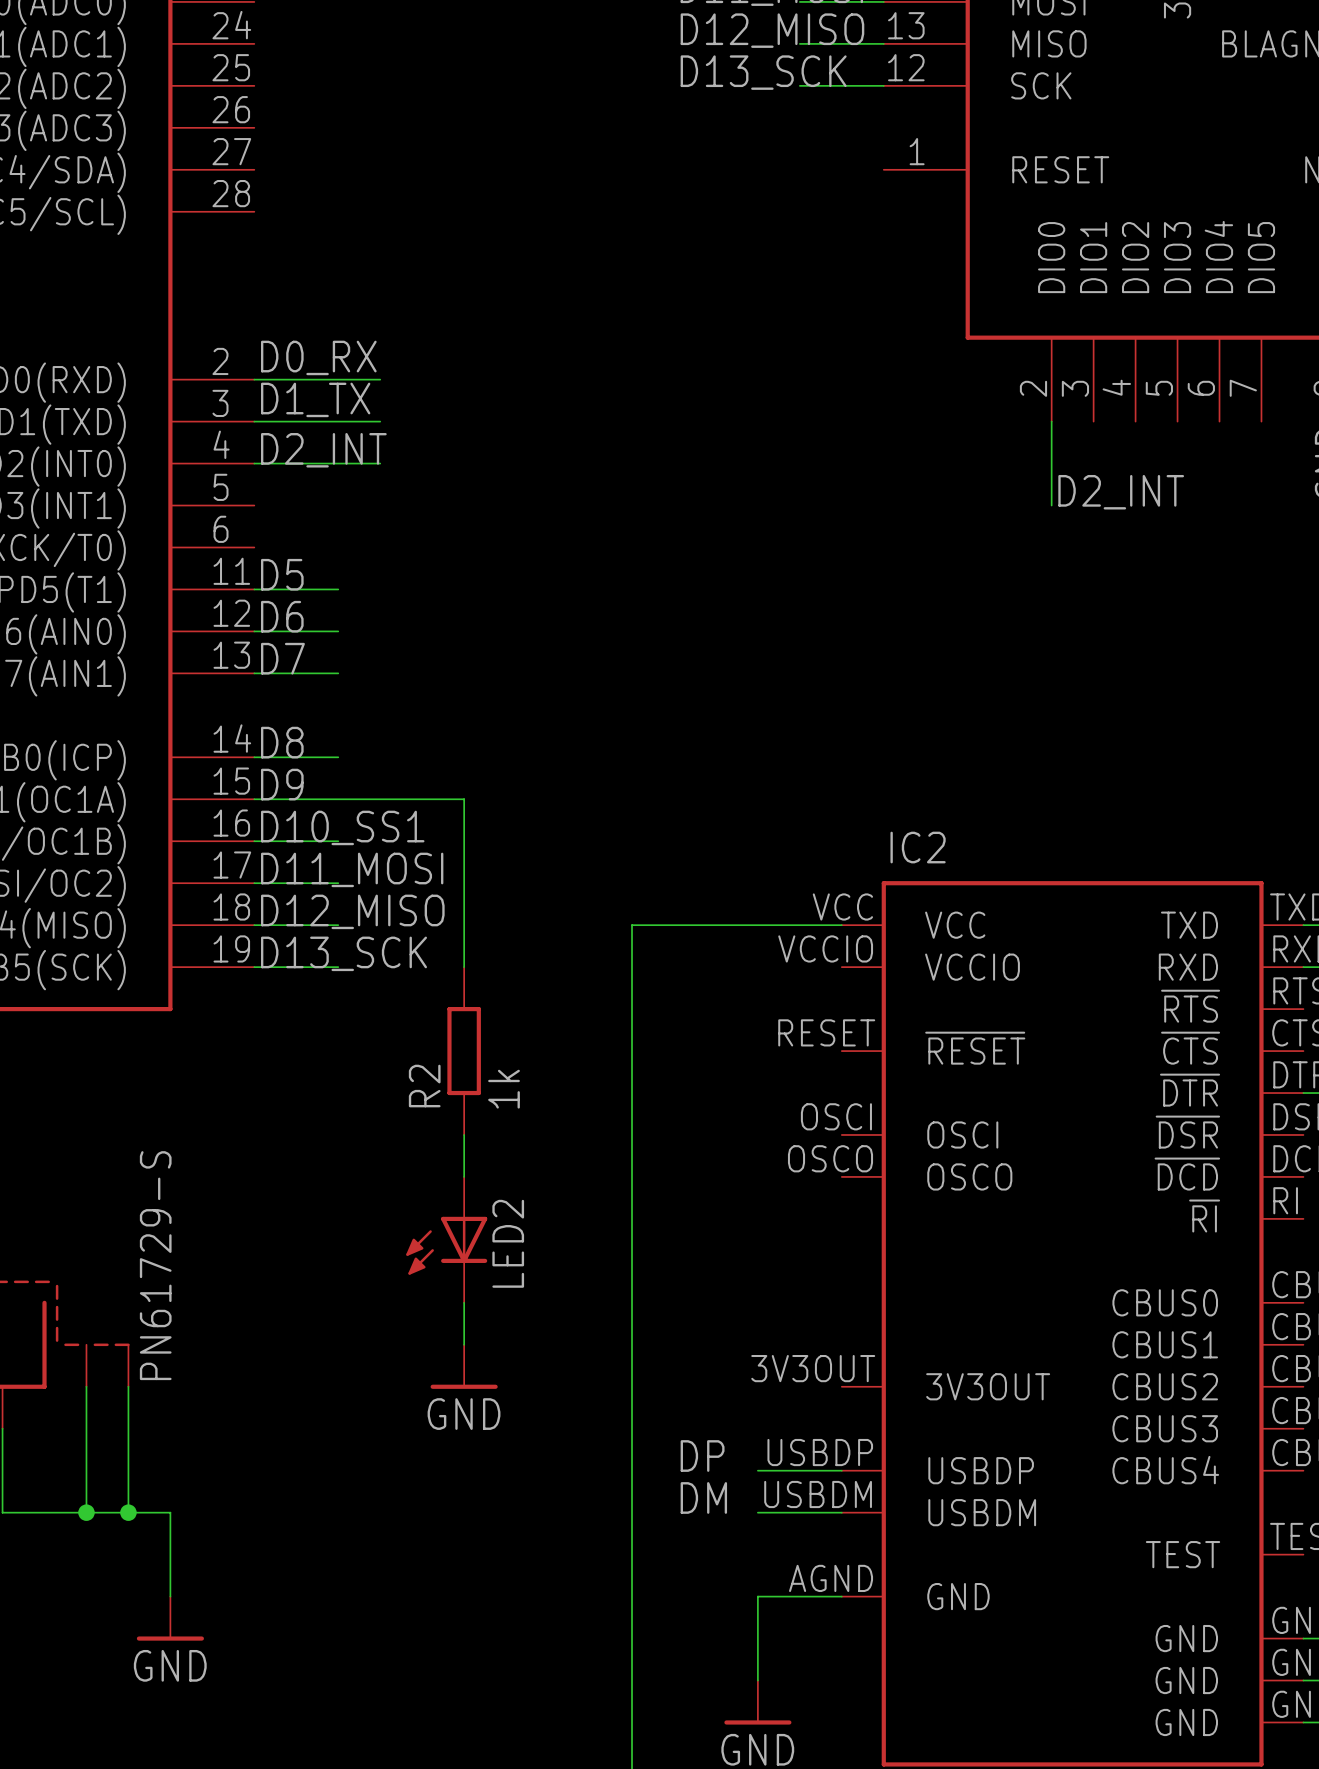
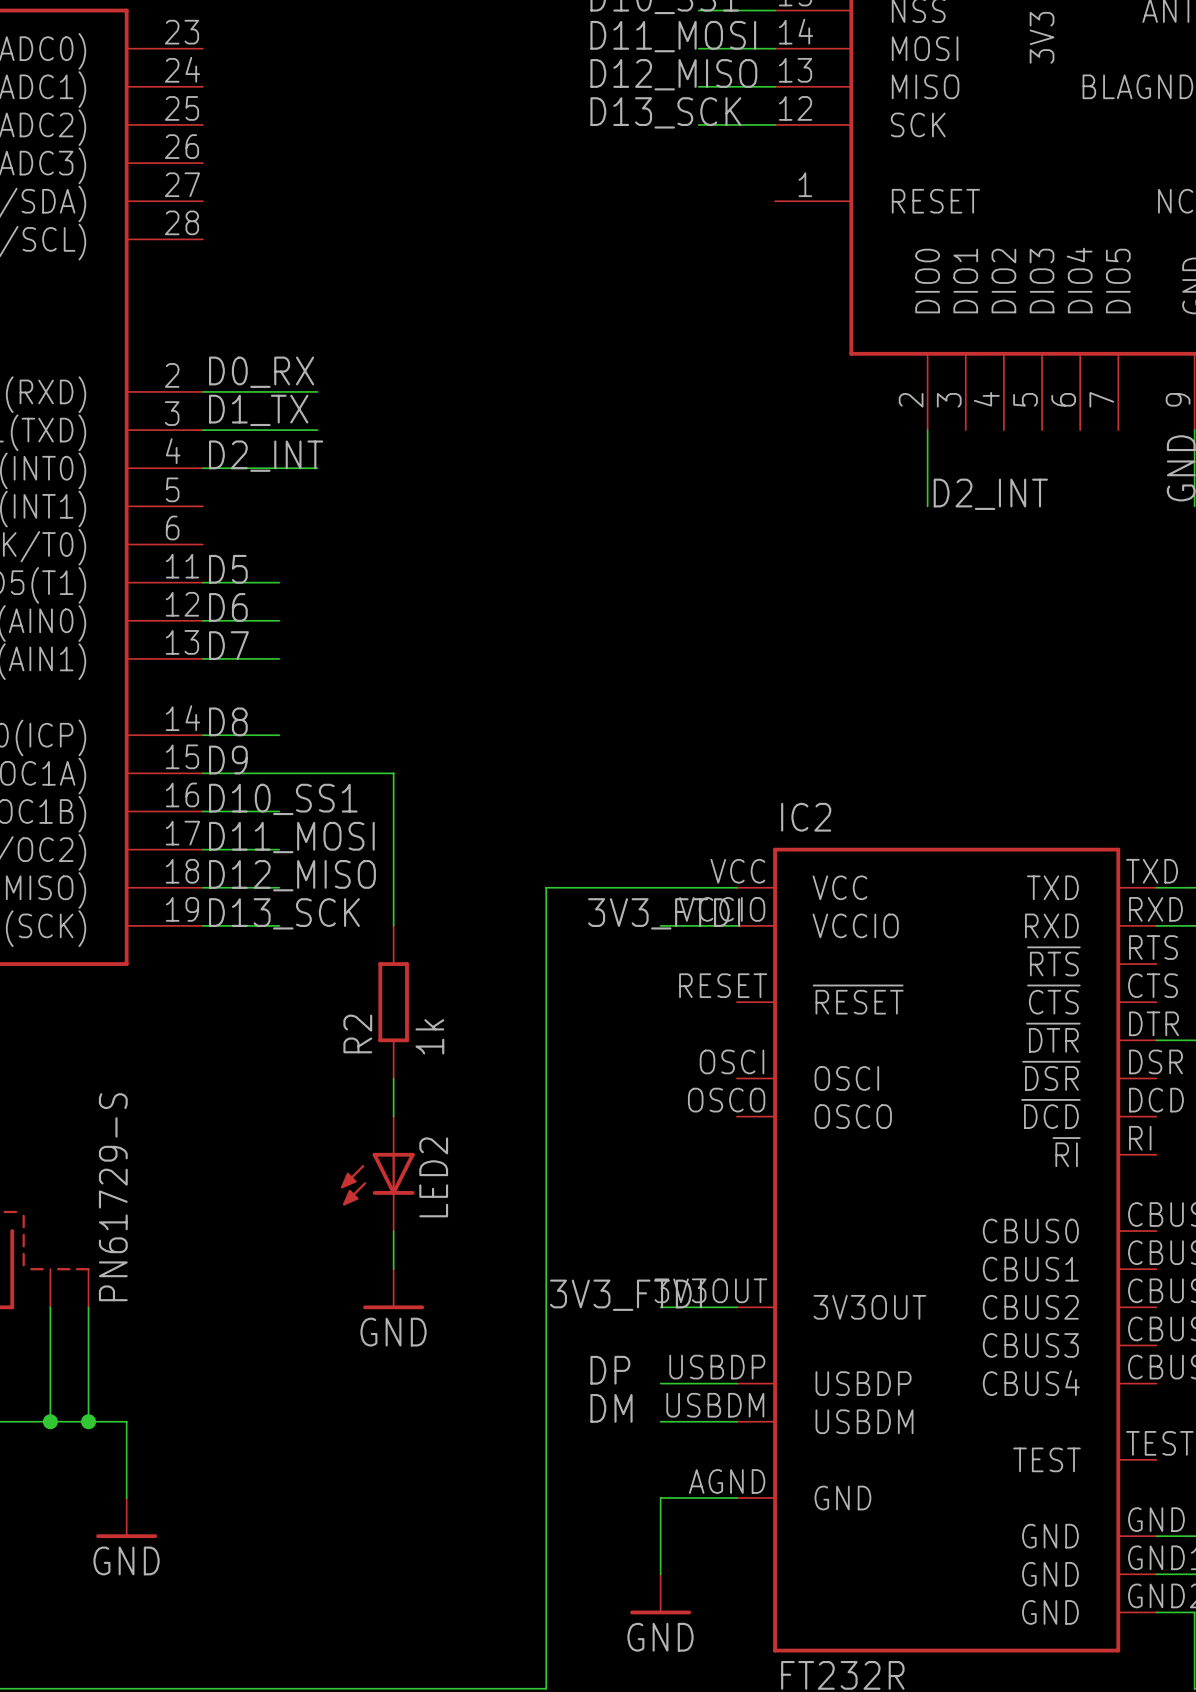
label: none -> 3V3_FTDI (664, 913)
wire: none -> (660, 925) (736, 925)
label: none -> 3V3_FTDI (625, 1295)
wire: none -> (660, 1307) (736, 1307)

